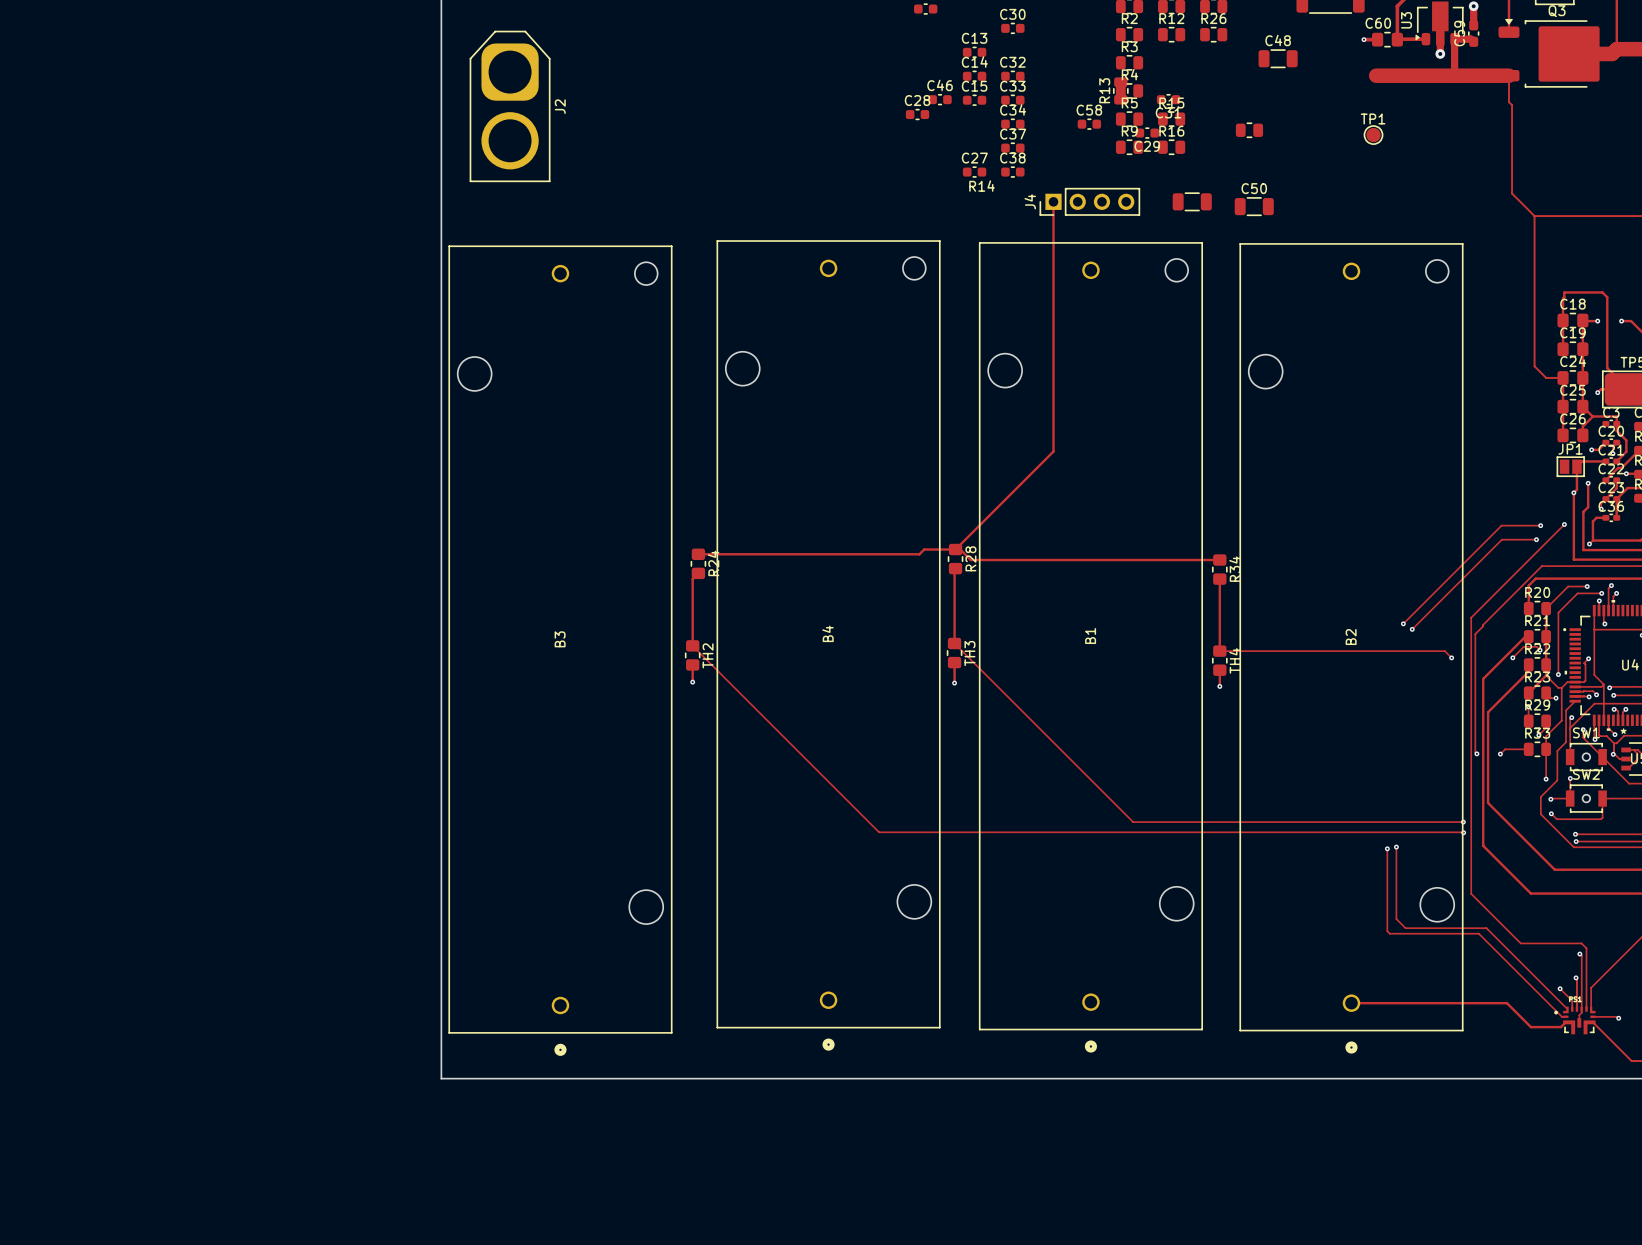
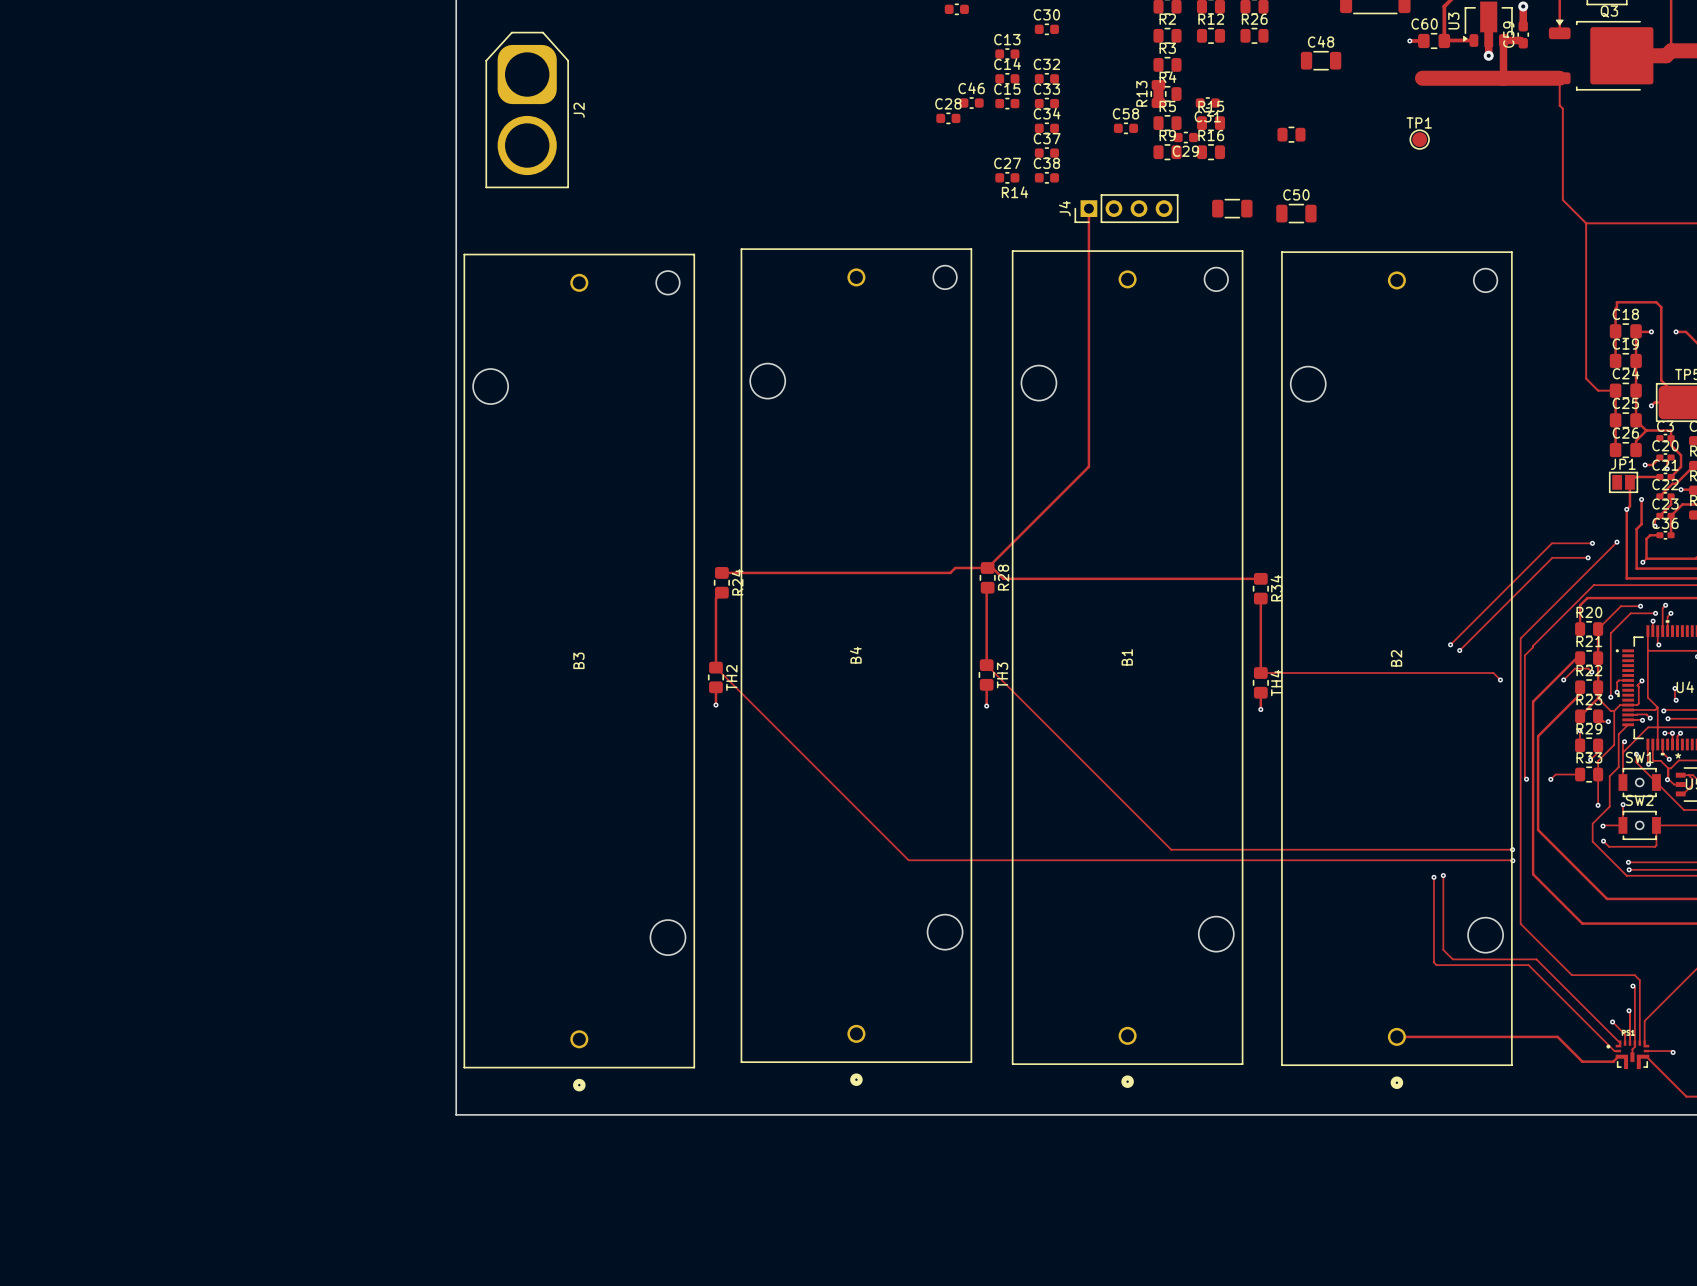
track: none -> (1628, 680) (1618, 680) (1617, 682) (1617, 692)
track: none -> (1675, 688) (1676, 700)
via: none -> (1674, 688)
via: none -> (1617, 692)
via: none -> (1676, 700)
via: none -> (1664, 733)
via: (1614, 709) -> none
via: none -> (1672, 733)

